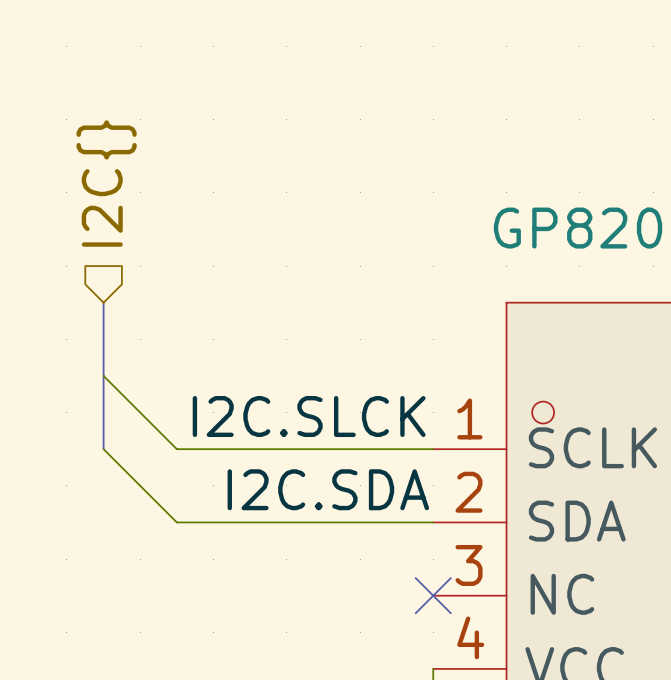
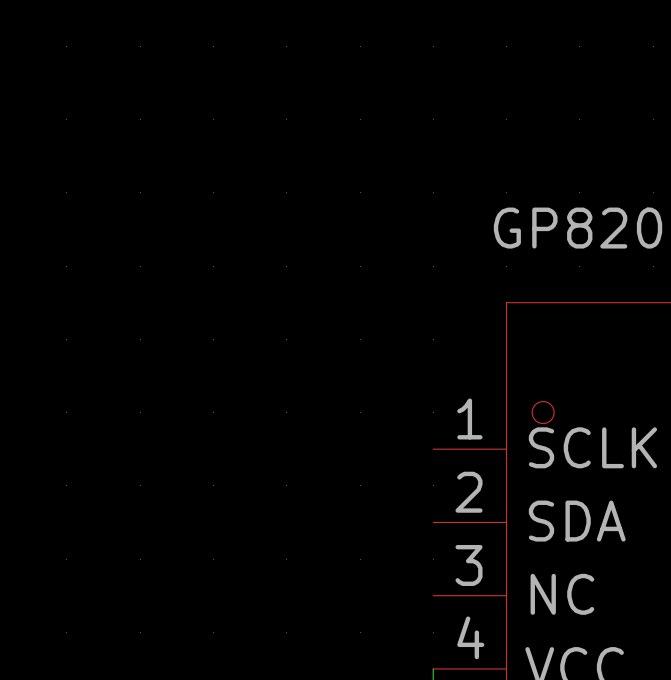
hierarchical label: I2C{} (106, 183) -> none
bus: (103, 302) (103, 449) -> none
wire: (103, 375) (176, 449) (433, 449) -> none
label: I2C.SLCK (309, 416) -> none
wire: (103, 449) (176, 522) (433, 522) -> none
label: I2C.SDA (328, 489) -> none
no-connect mark: (433, 595) -> none

